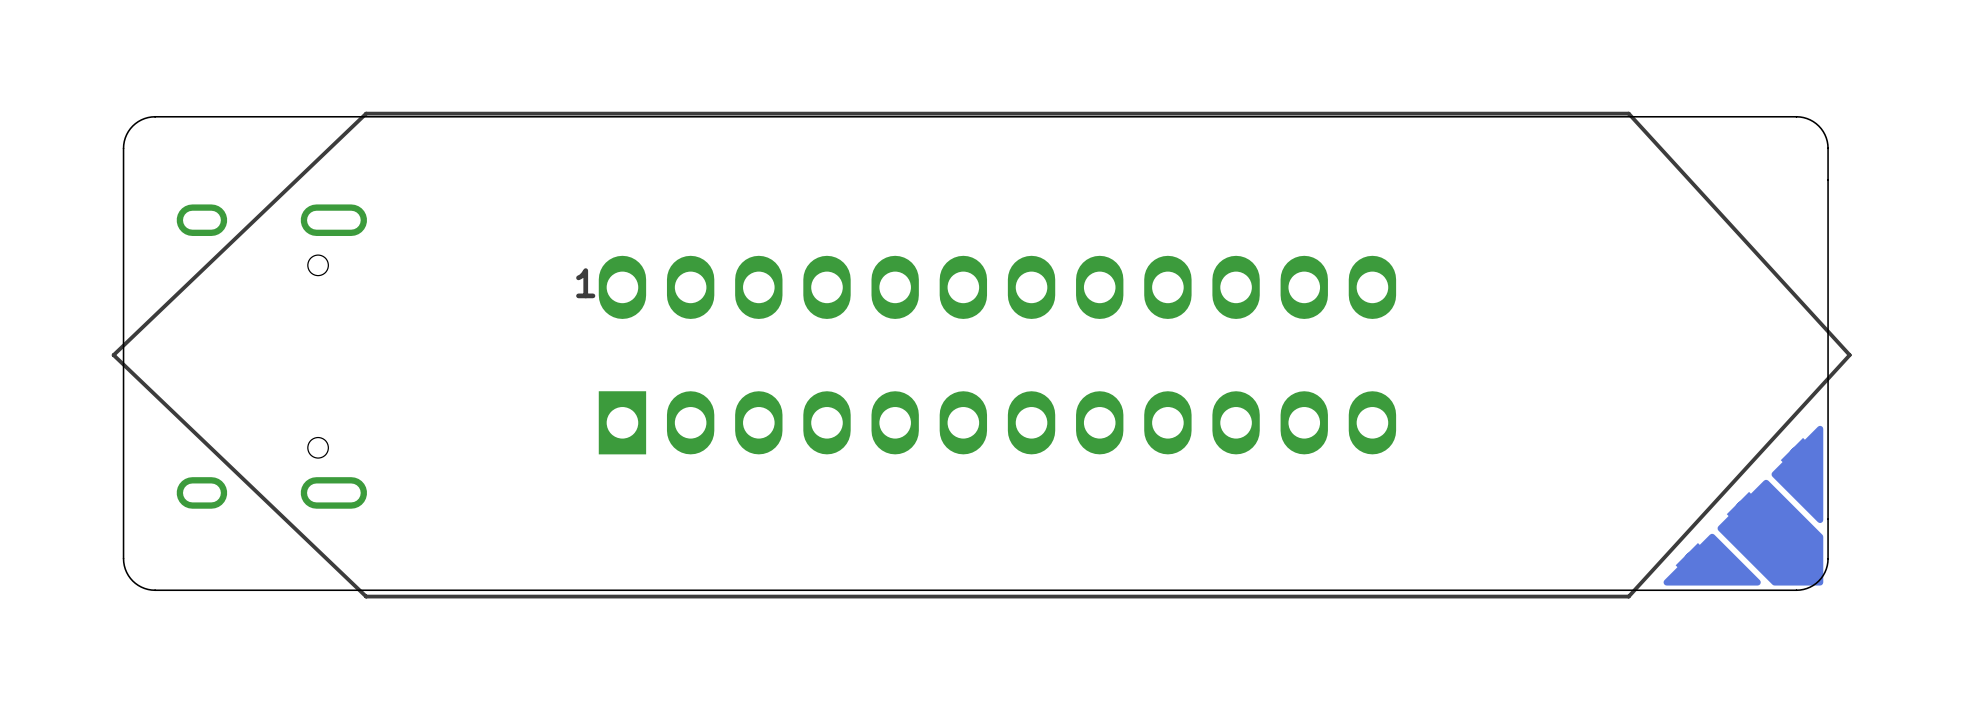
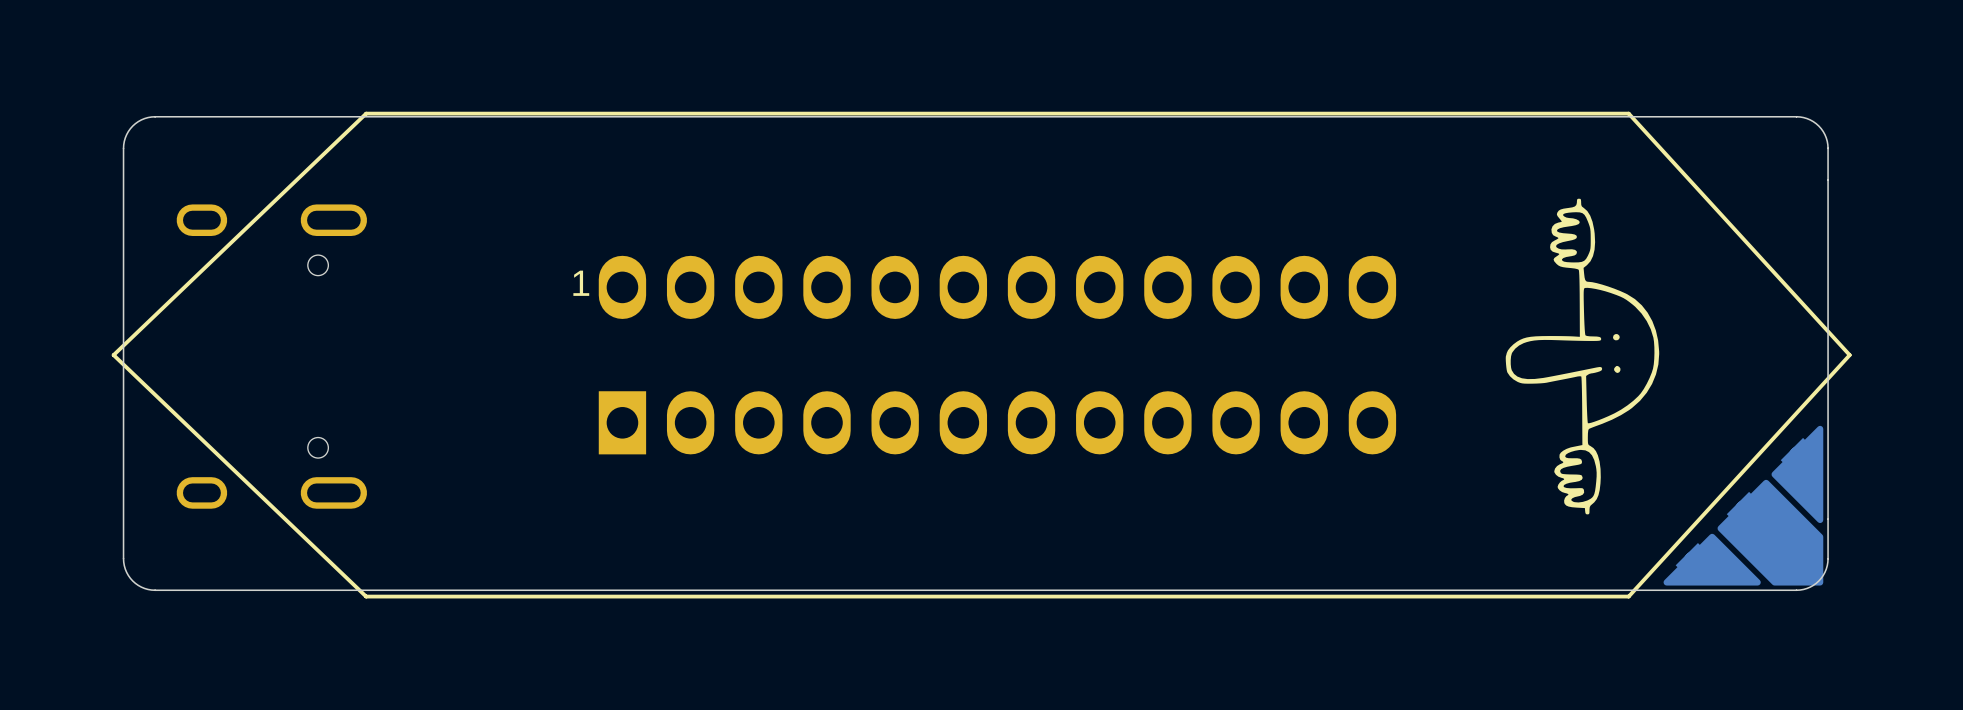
drawing: none -> [1505, 198, 1660, 515]

